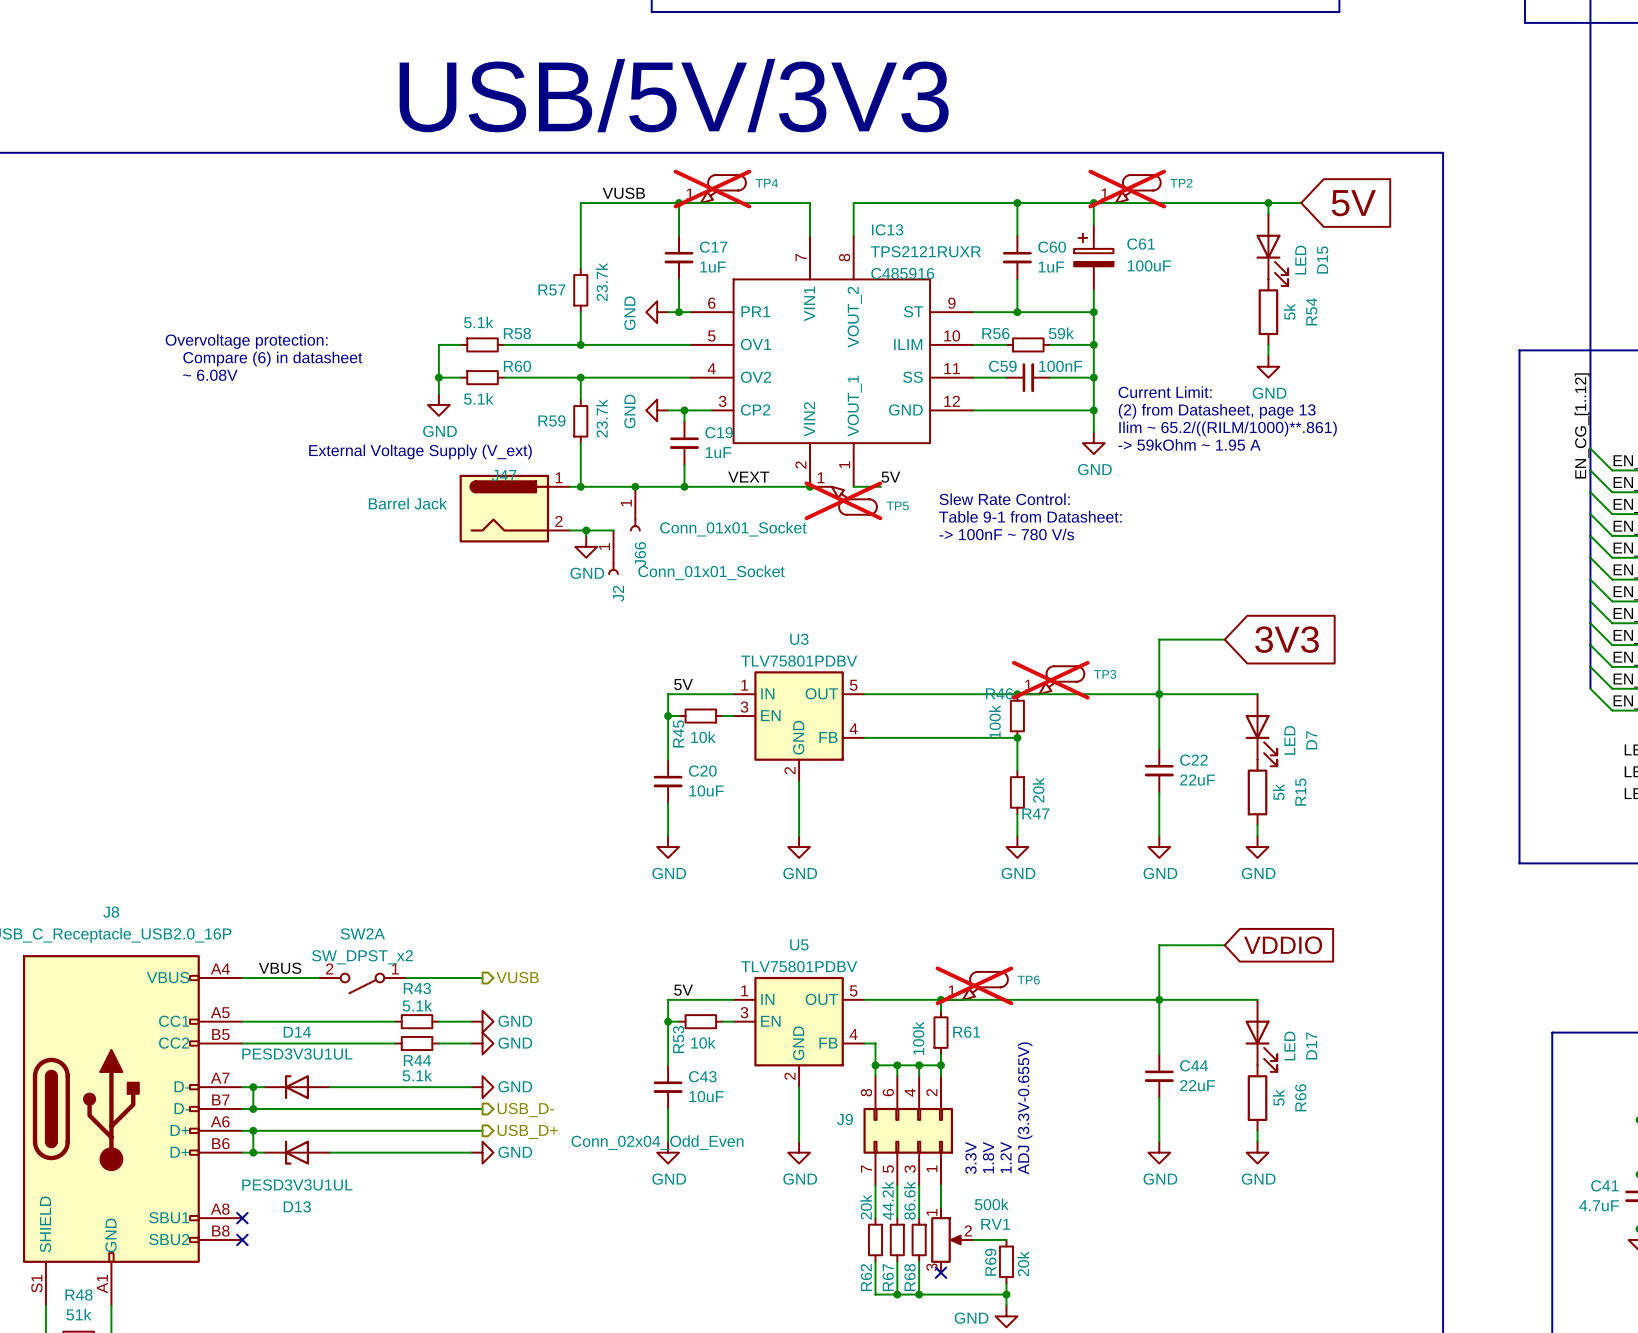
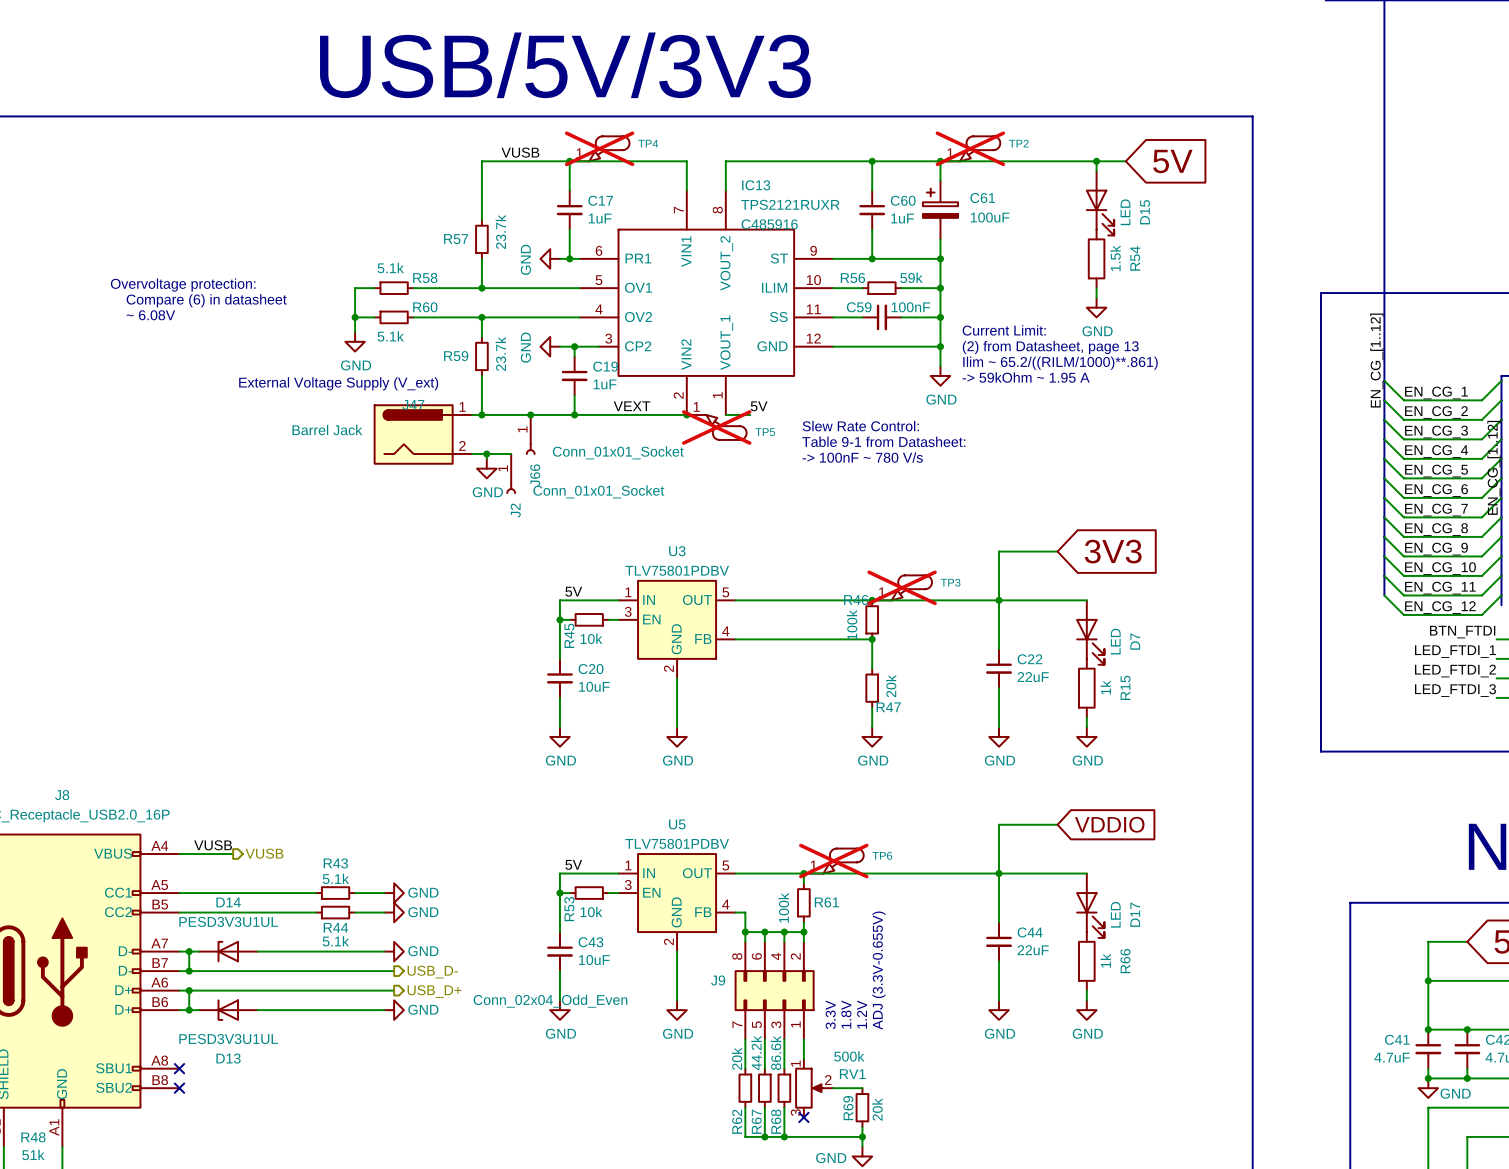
R54 value: 5k (1289, 311) -> 1.5k (1115, 258)
R15 value: 5k (1278, 792) -> 1k (1105, 687)
label: VBUS (280, 968) -> VUSB (213, 845)
hierarchical label position: VUSB (517, 977) -> VUSB (264, 853)
wire: (302, 978) (318, 978) -> none
wire: (406, 978) (482, 978) -> none
SW2A: SW_DPST_x2 (362, 983) -> none
R66 value: 5k (1278, 1097) -> 1k (1105, 960)

